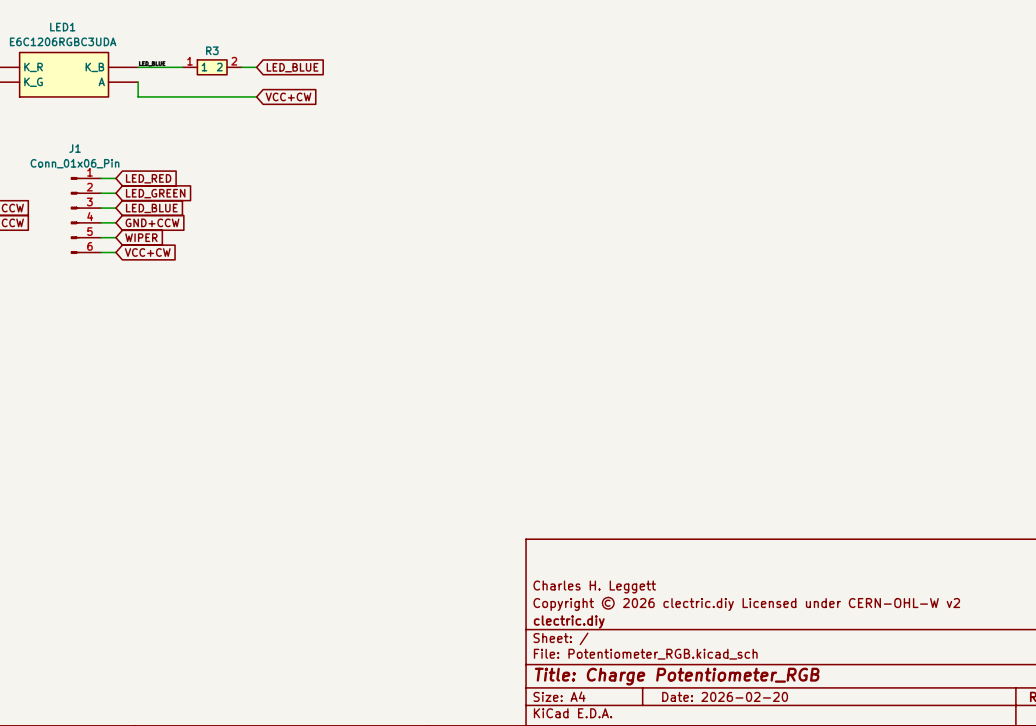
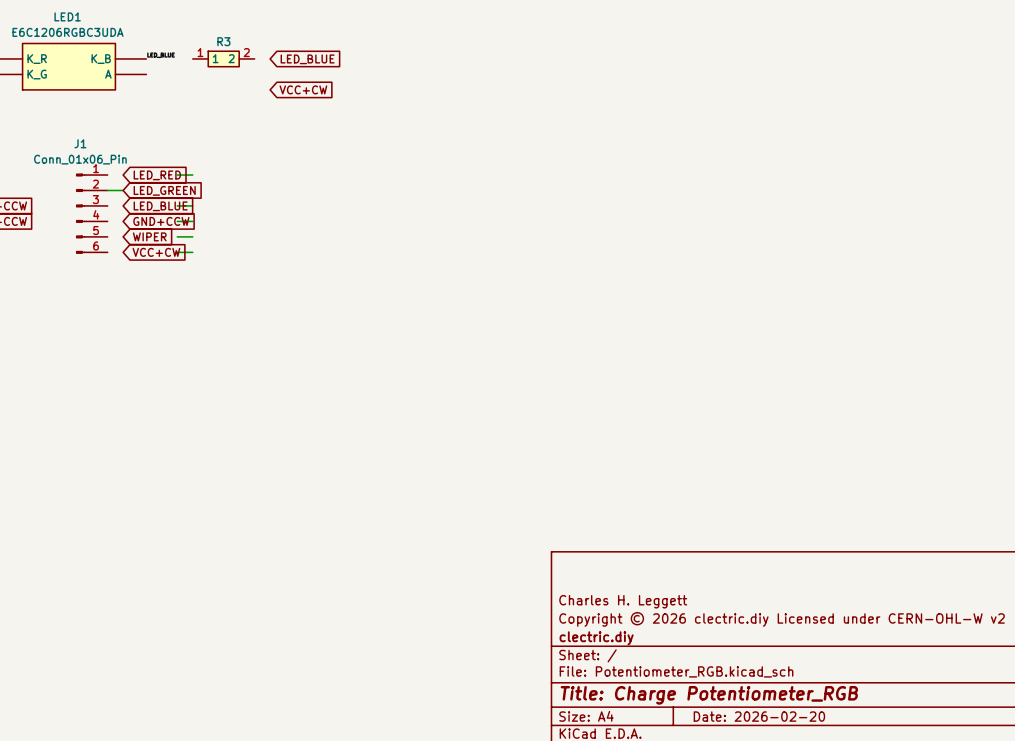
wire: (138, 67) (182, 67) -> none
wire: (241, 67) (256, 67) -> none
wire: (138, 82) (138, 96) (256, 96) -> none
wire: (101, 178) (115, 178) -> (177, 175) (192, 175)
wire: (101, 208) (115, 208) -> (177, 205) (192, 205)
wire: (101, 222) (115, 222) -> (177, 221) (192, 221)
wire: (101, 237) (115, 237) -> (177, 236) (192, 236)
wire: (101, 252) (115, 252) -> (177, 252) (192, 252)

